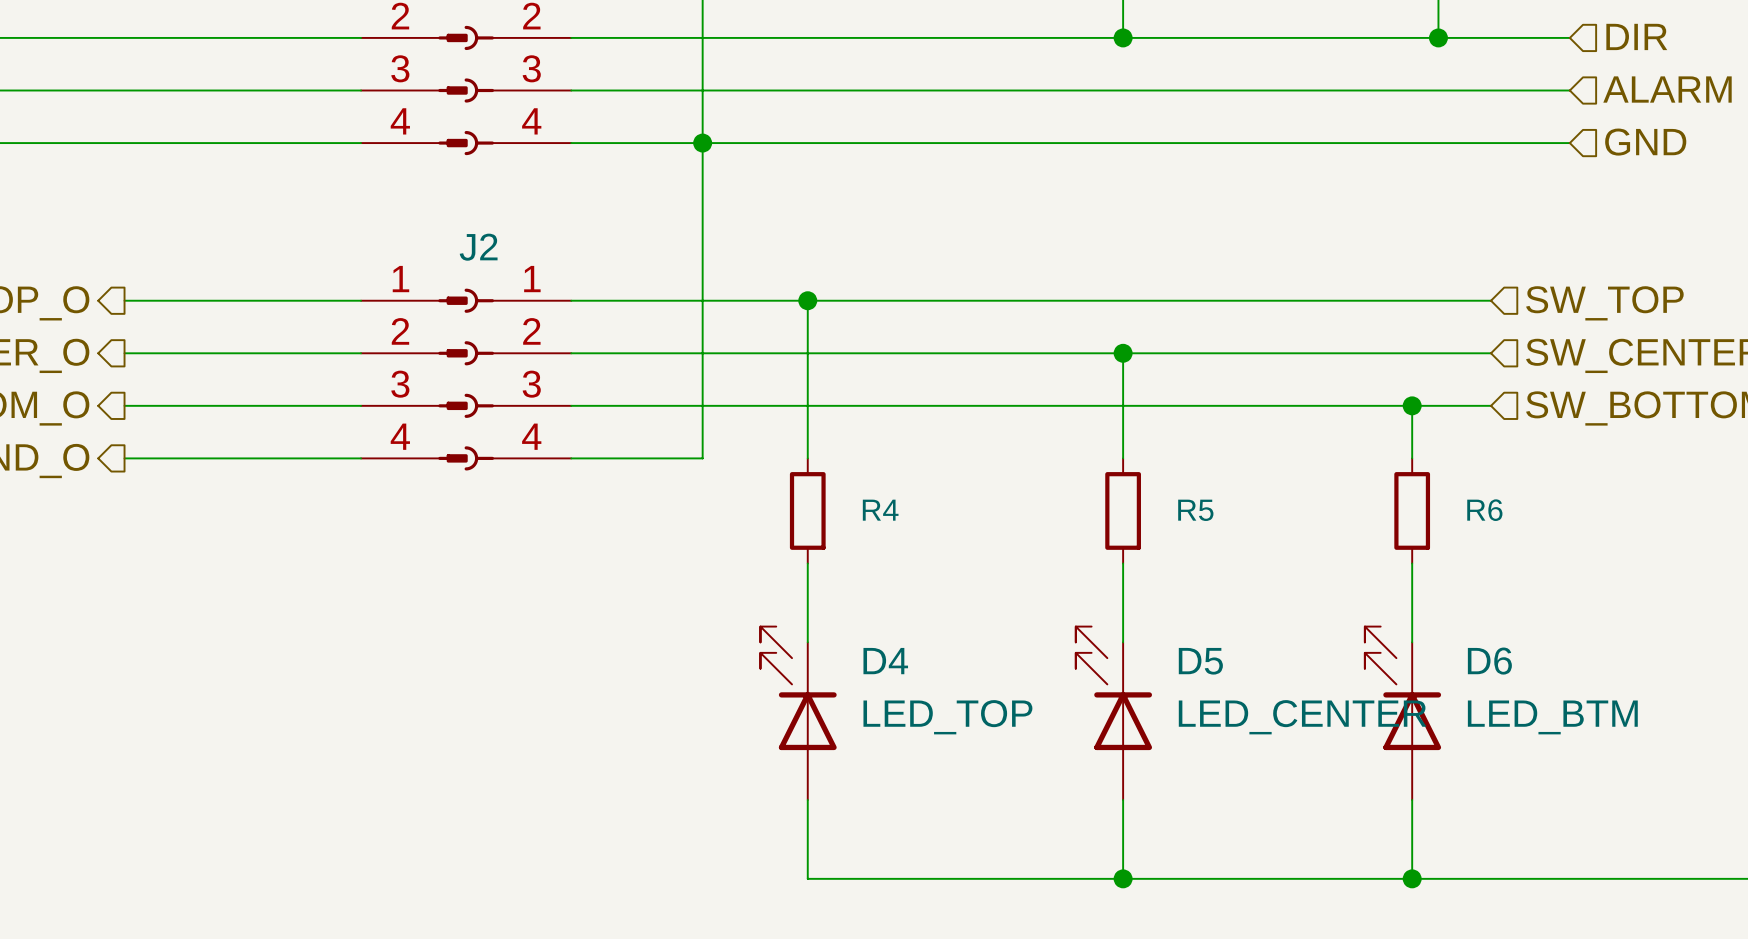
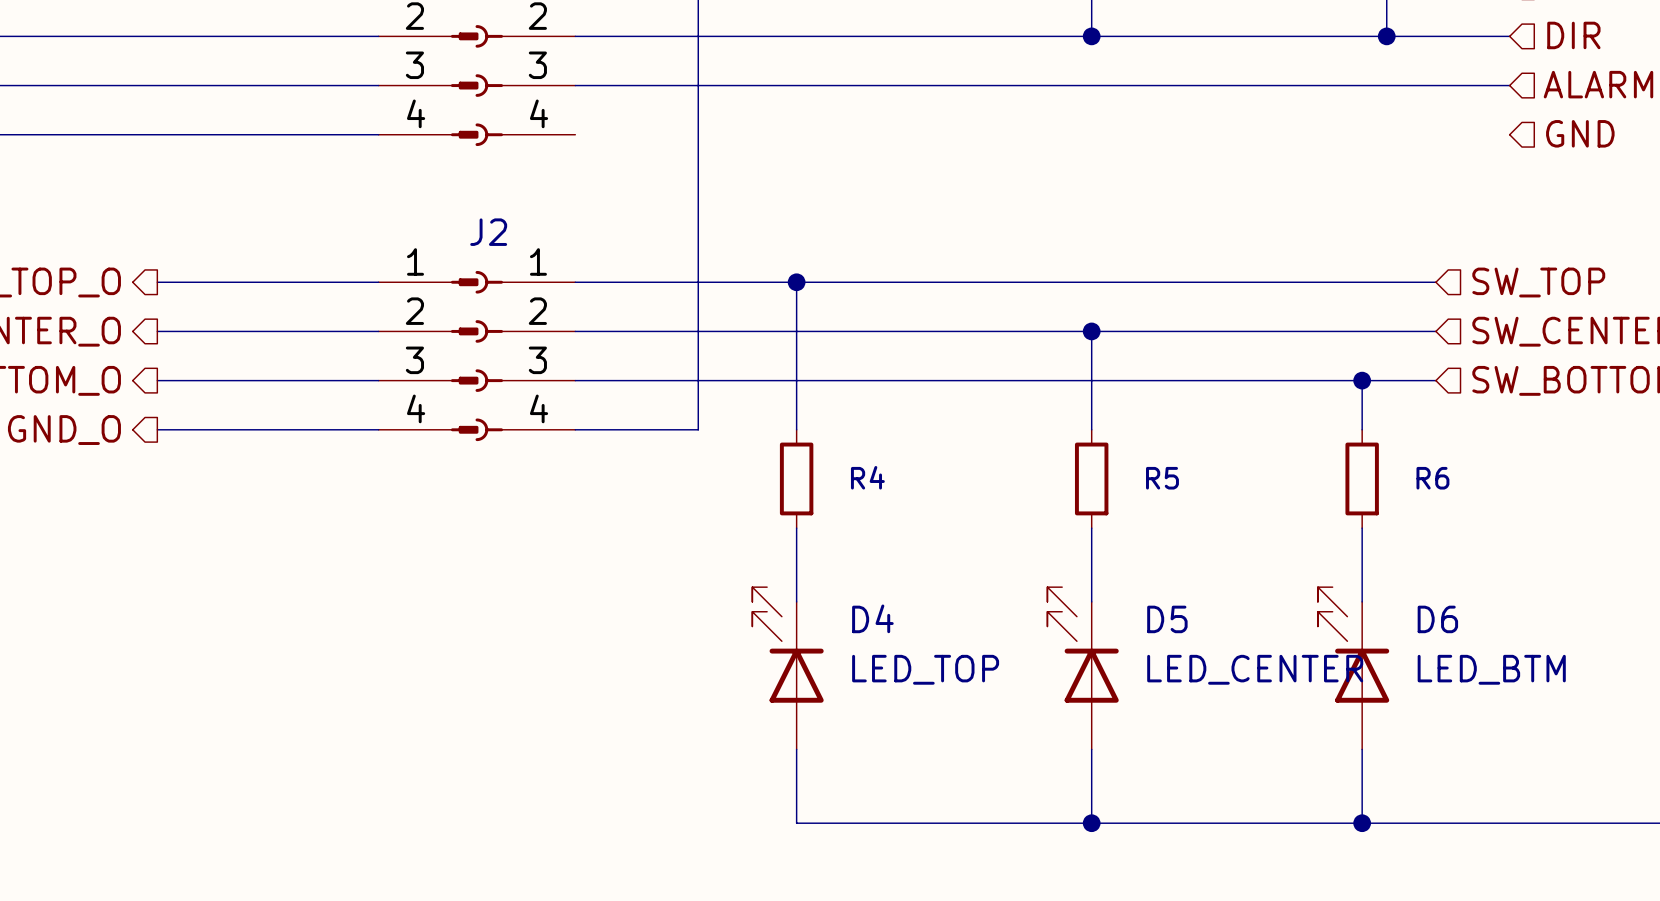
wire: (571, 143) (1569, 143) -> none
junction: (702, 143) -> none

